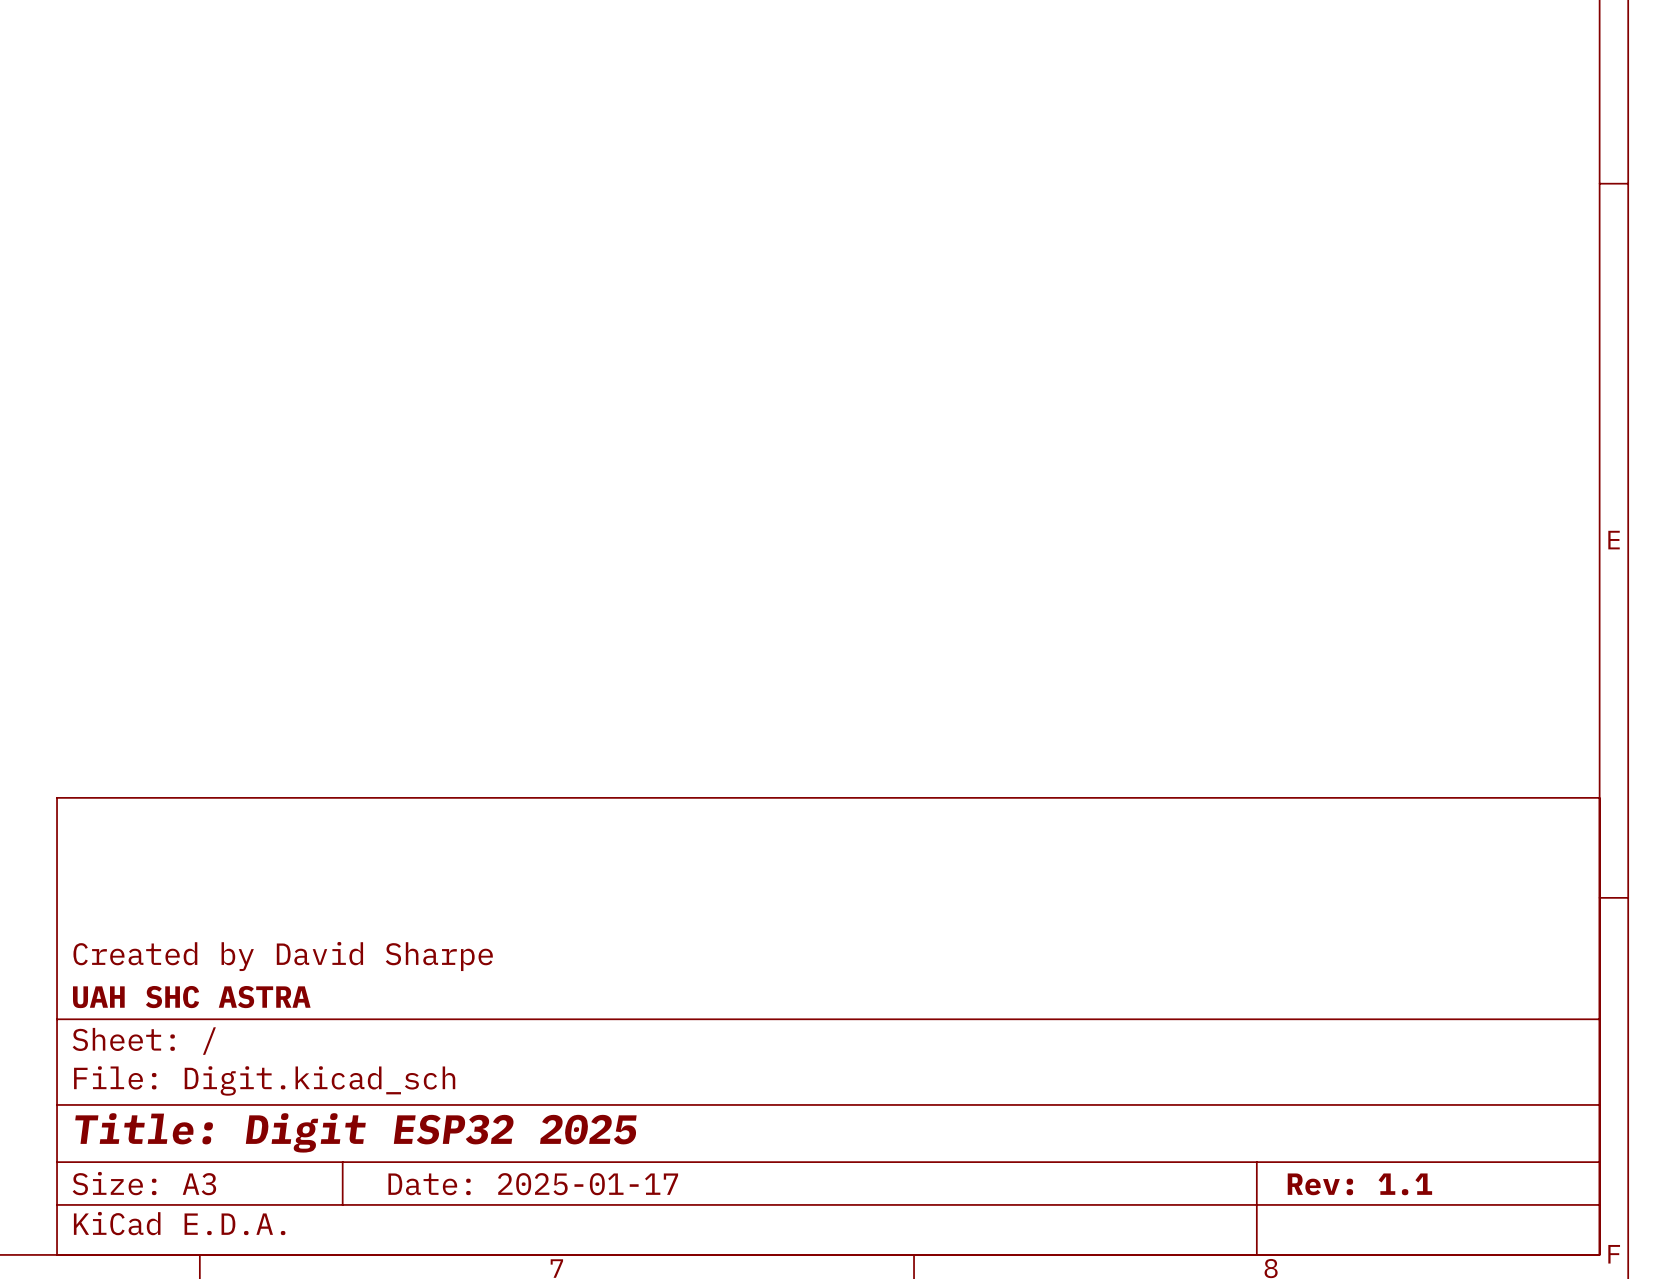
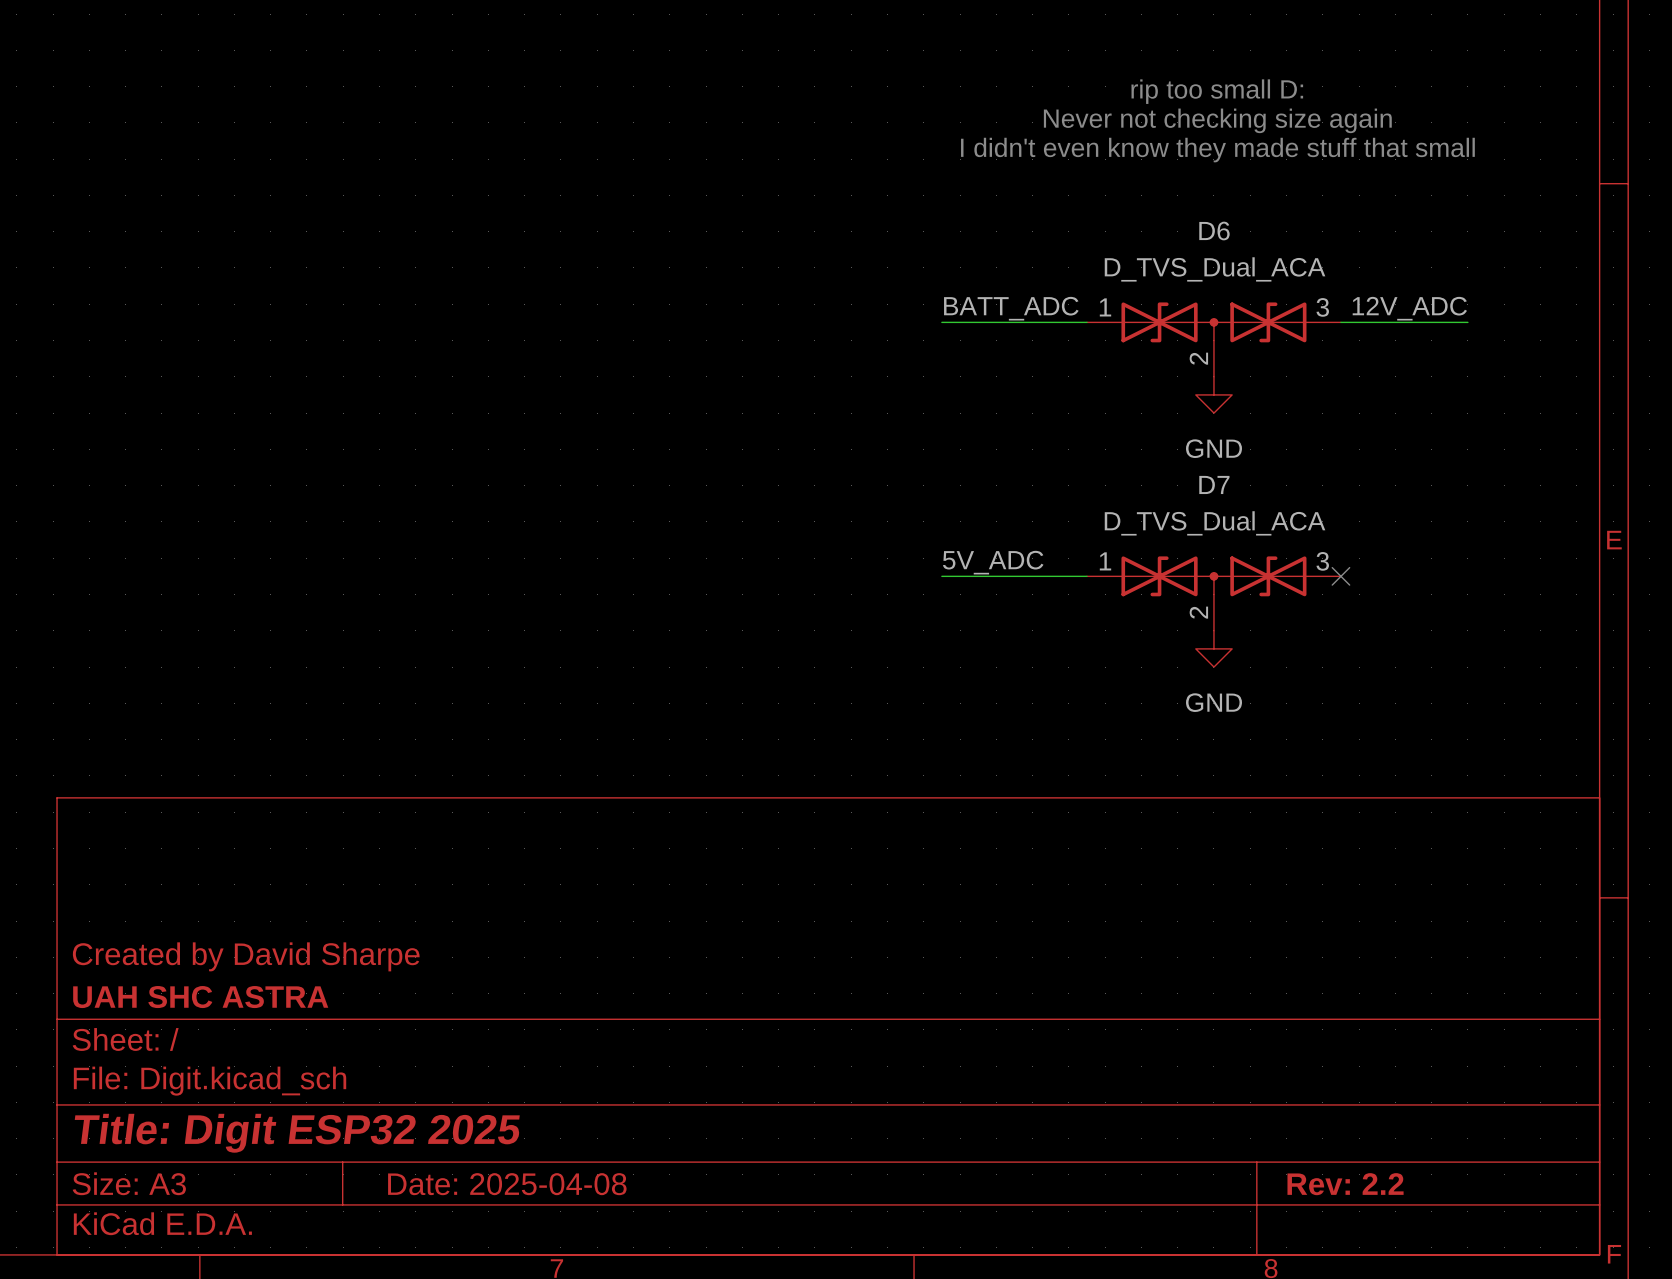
text: none -> rip too small D: (1217, 91)
text: none -> Never not checking size again (1217, 120)
text: none -> I didn't even know they made stuff that small (1217, 150)
label: none -> BATT_ADC (1011, 308)
label: none -> 12V_ADC (1409, 308)
wire: none -> (941, 322) (1086, 322)
wire: none -> (1340, 322) (1467, 322)
D6: none -> D_TVS_Dual_ACA (1213, 339)
power symbol: none -> GND (1213, 394)
label: none -> 5V_ADC (993, 562)
wire: none -> (941, 576) (1086, 576)
no-connect mark: none -> (1340, 576)
D7: none -> D_TVS_Dual_ACA (1213, 593)
power symbol: none -> GND (1213, 648)
title block: Date: 2025-01-17 (533, 1184) -> Date: 2025-04-08 (507, 1184)
title block: Rev: 1.1 (1359, 1184) -> Rev: 2.2 (1345, 1184)

